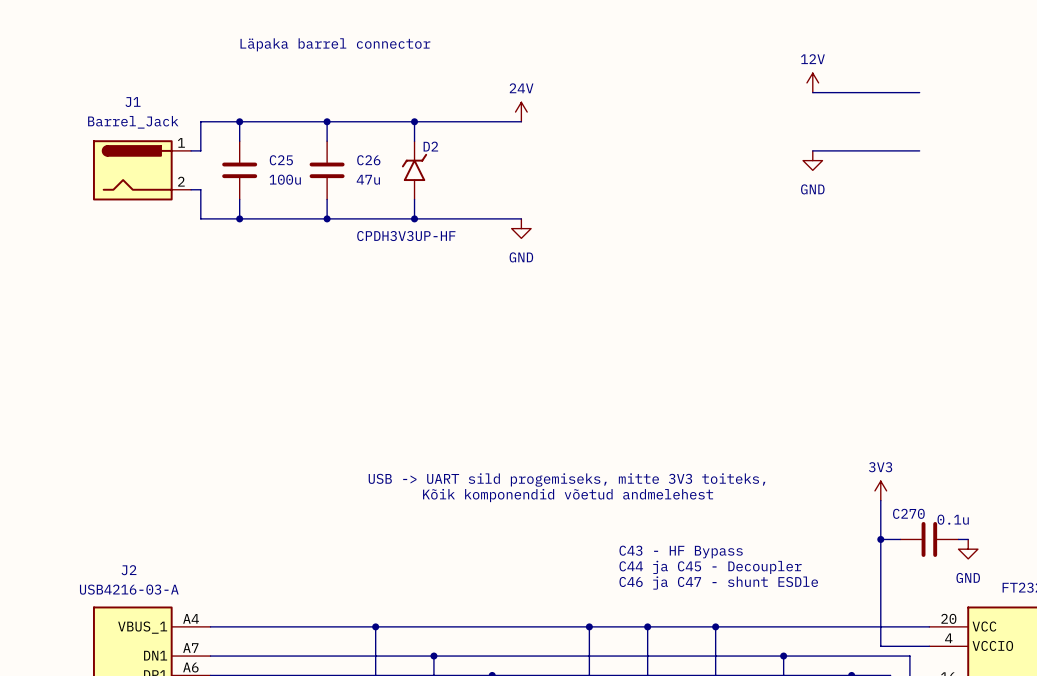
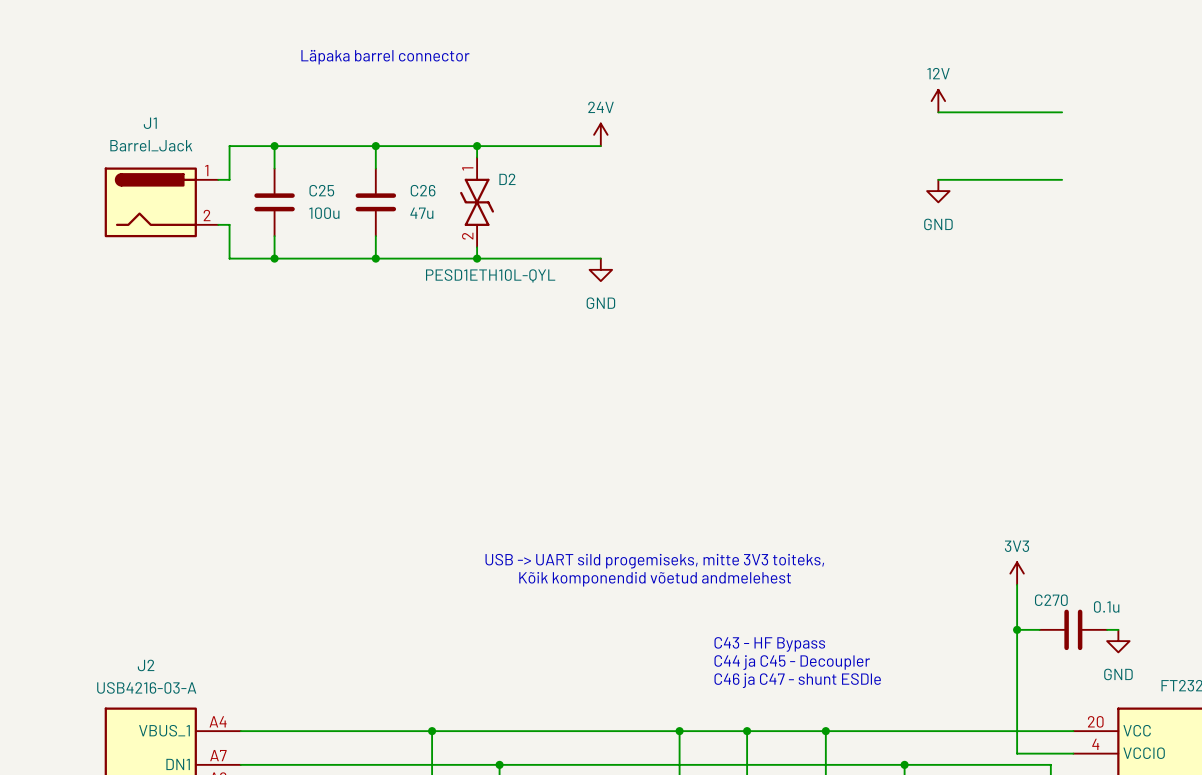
D2 symbol: [401, 141, 428, 200] -> [460, 157, 495, 248]
D2 value: CPDH3V3UP-HF (406, 236) -> PESD1ETH10L-QYL (490, 275)

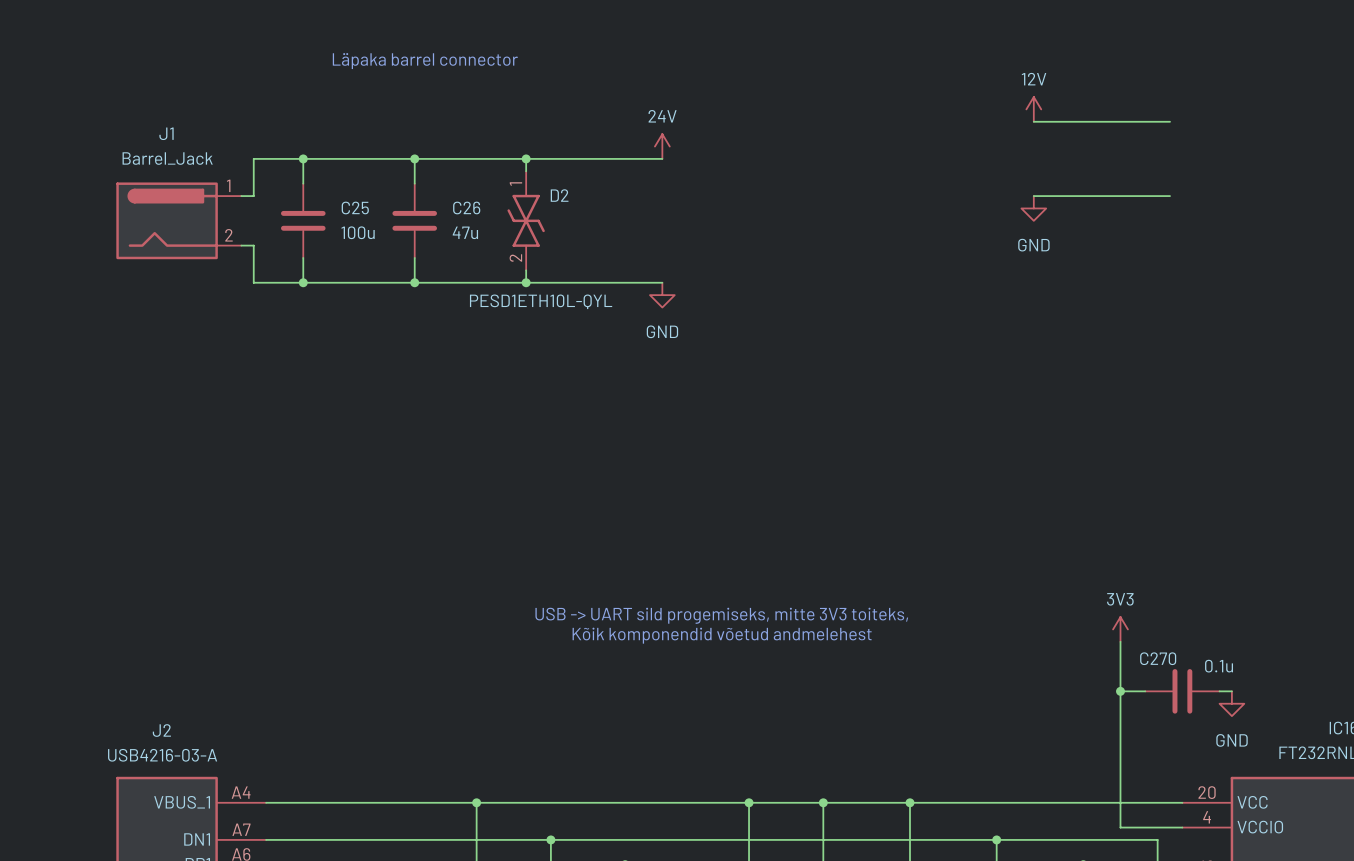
text: C43 - HF Bypass (769, 644) -> none
text: C44 ja C45 - Decoupler (792, 662) -> none
text: C46 ja C47 - shunt ESDle (797, 680) -> none

